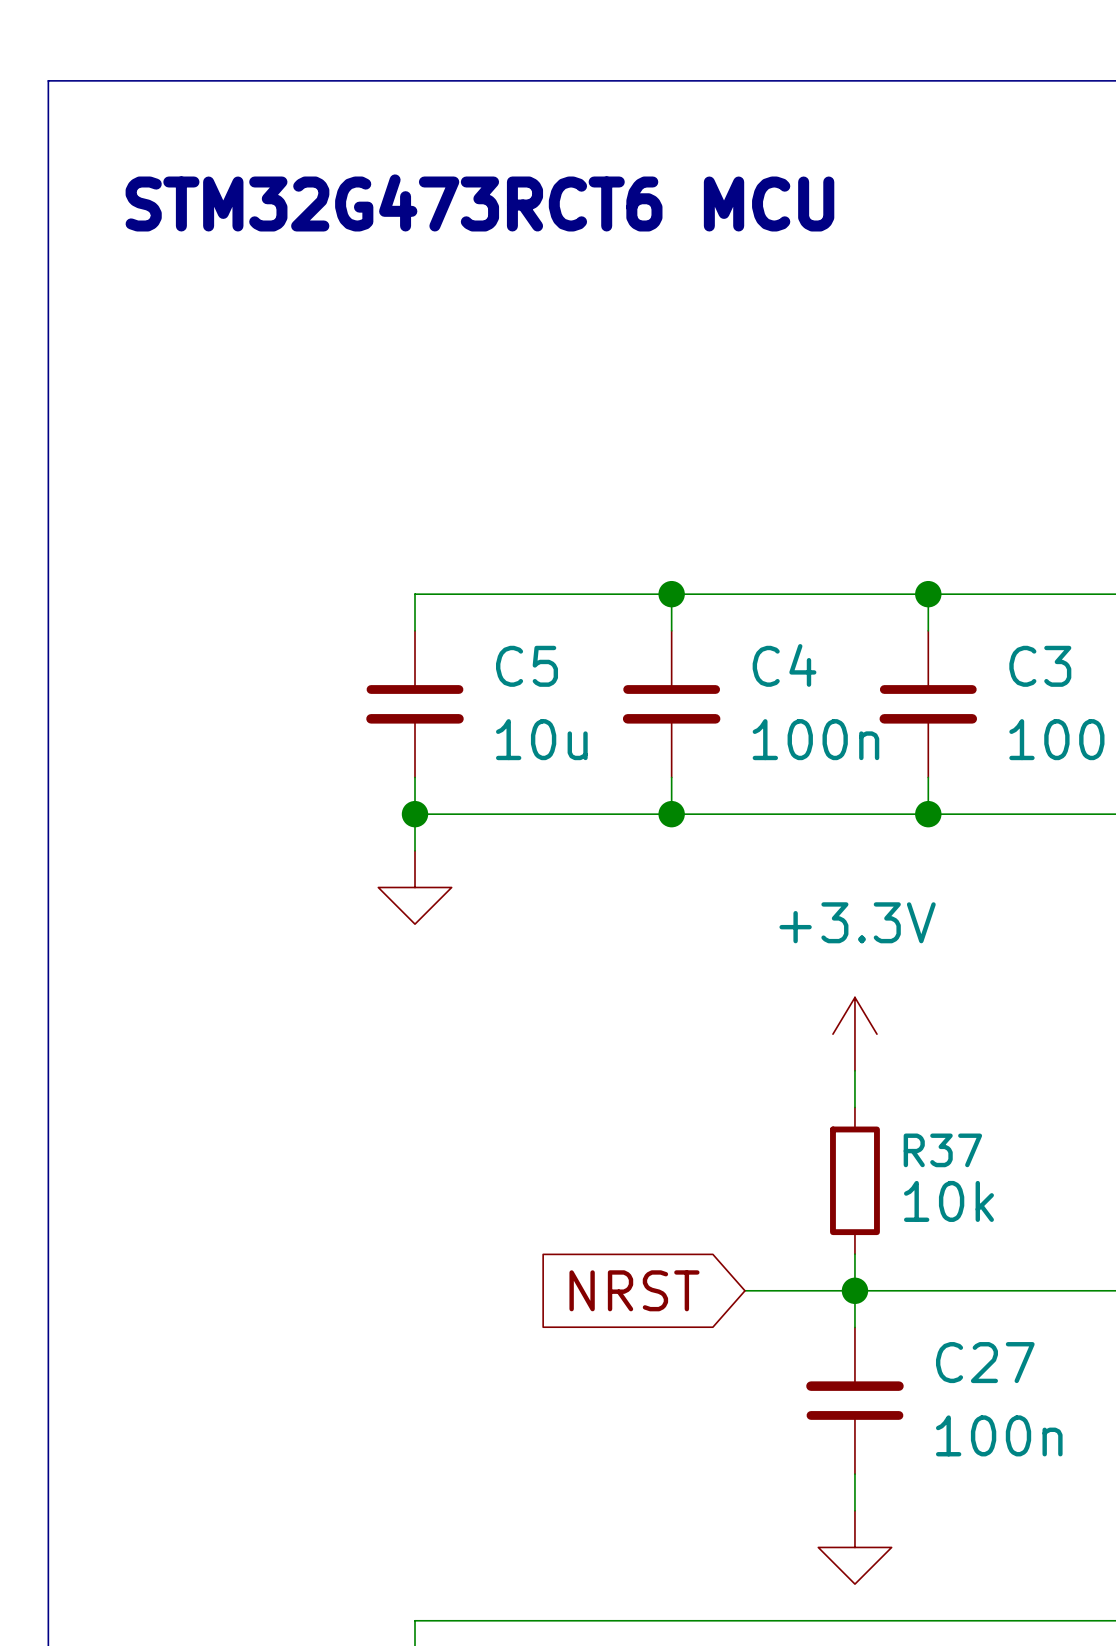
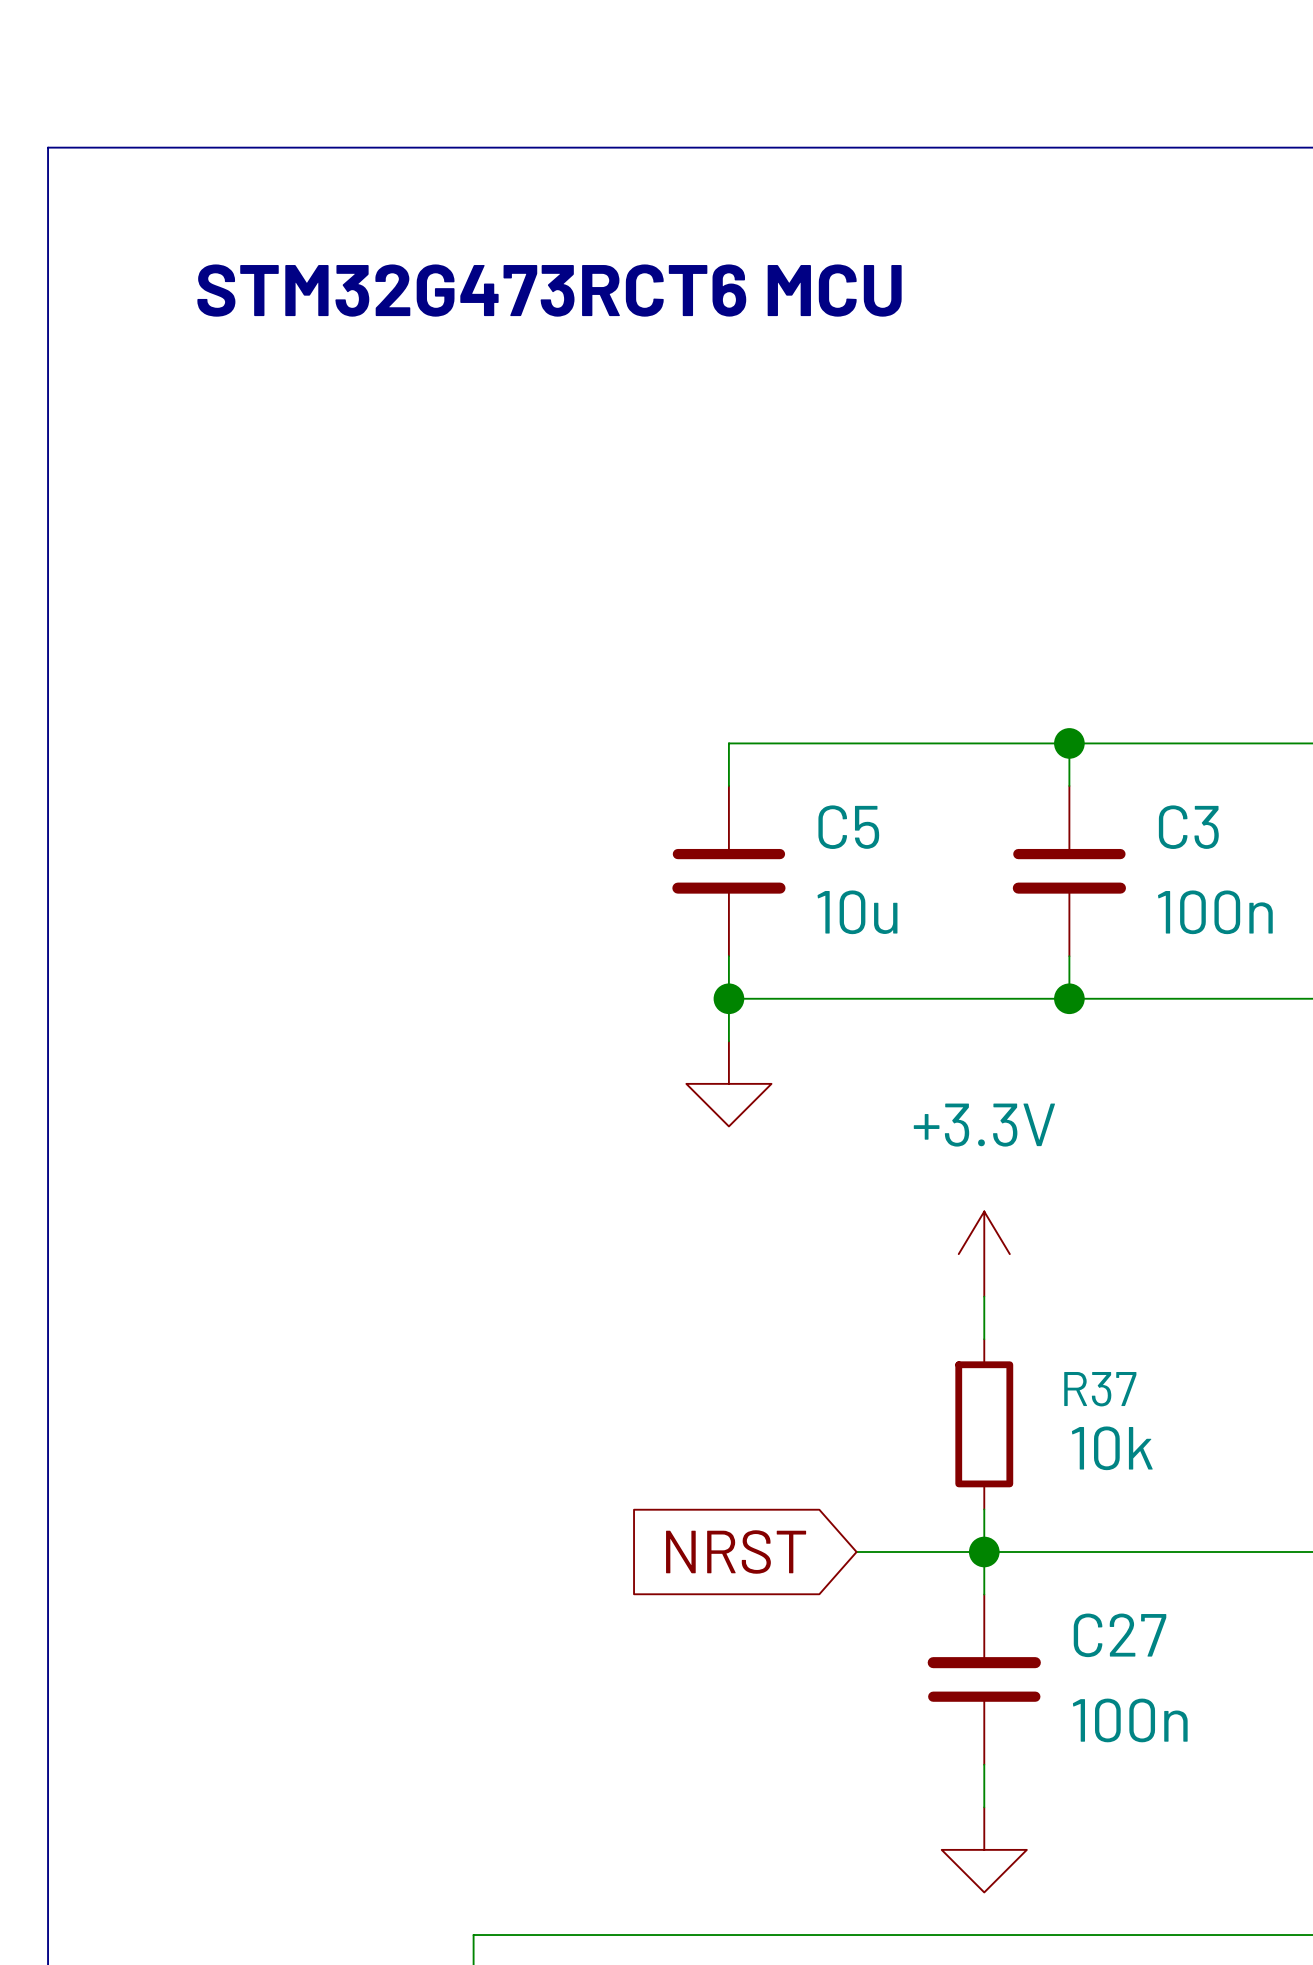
wire: (634, 594) (414, 594) (414, 630) -> (728, 743) (728, 785)
wire: (671, 594) (671, 630) -> none
junction: (671, 594) -> none
C5 position: (414, 704) -> (728, 871)
C4: 100n (671, 704) -> none
wire: (414, 777) (414, 850) -> (728, 956) (728, 1041)
wire: (671, 777) (671, 814) -> none
wire: (414, 814) (634, 814) -> none
junction: (414, 814) -> none
junction position: (671, 814) -> (728, 998)
power symbol position: (414, 887) -> (728, 1083)

